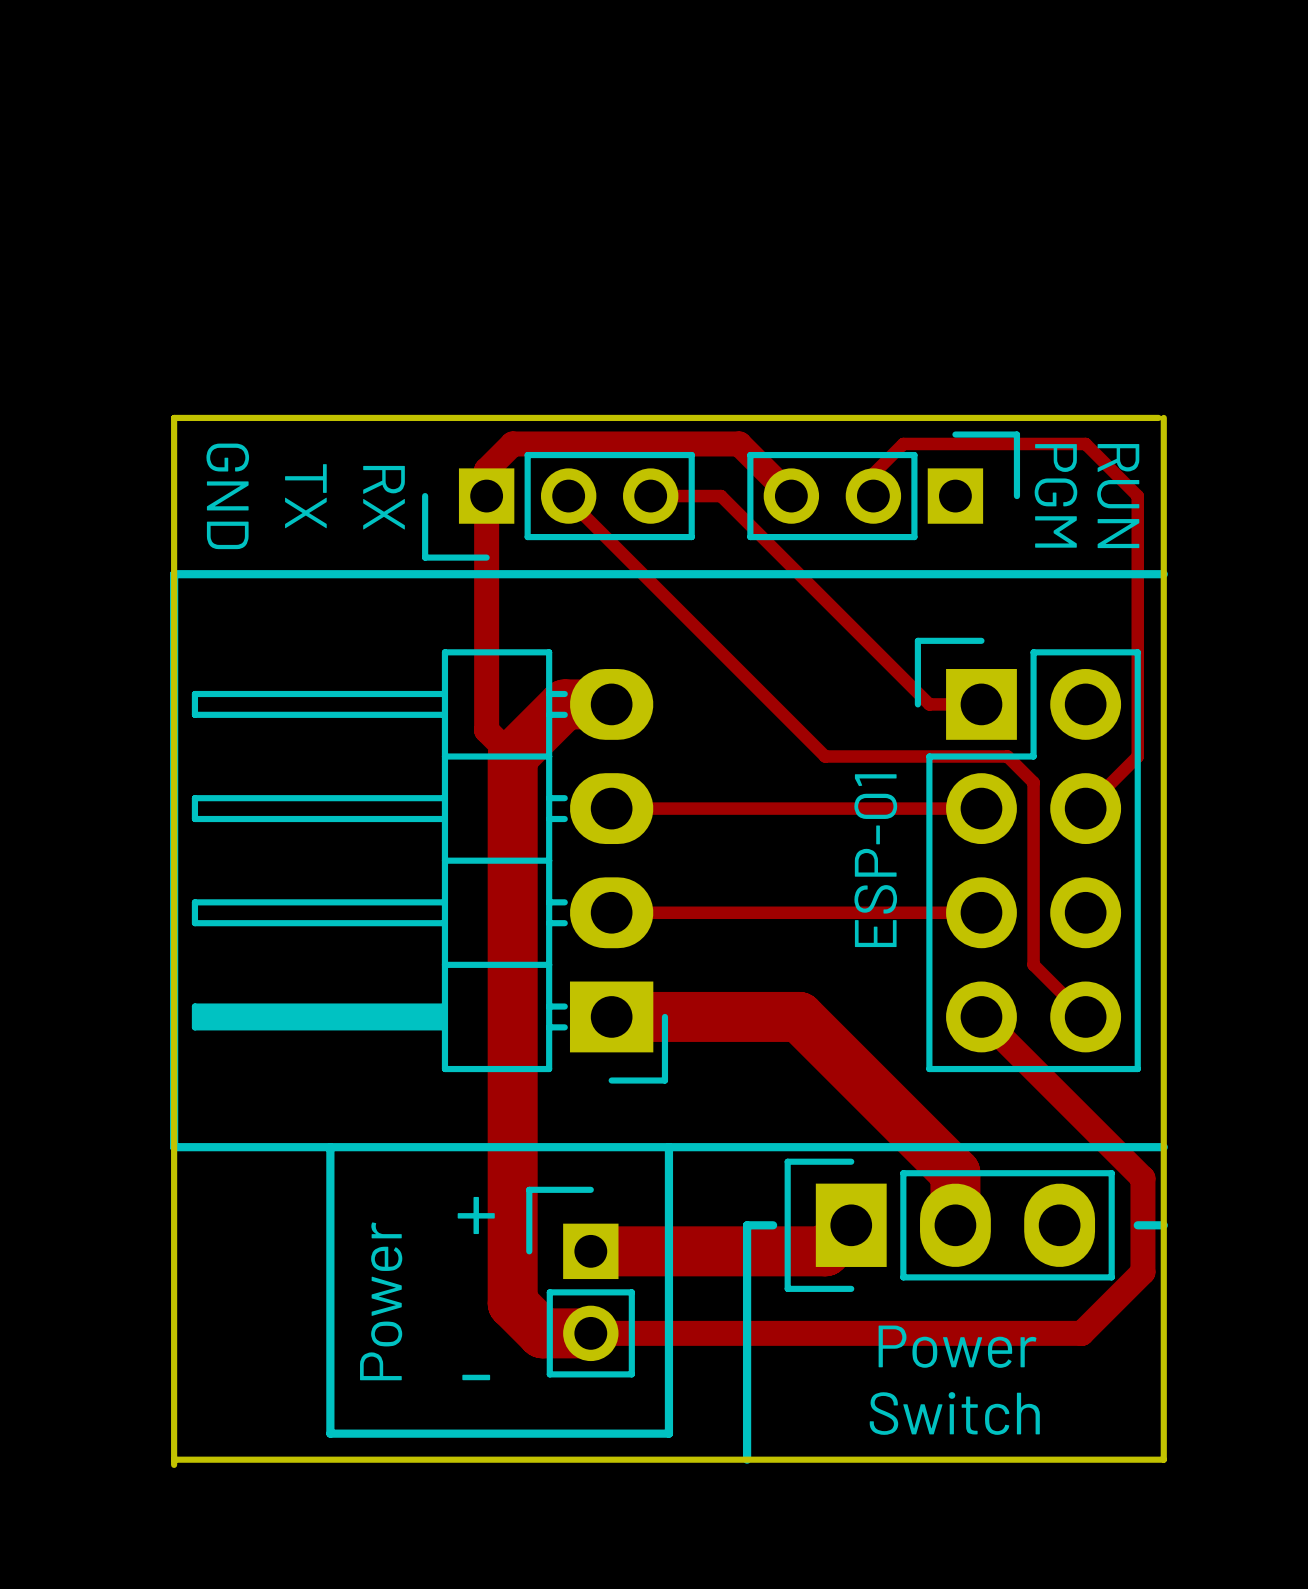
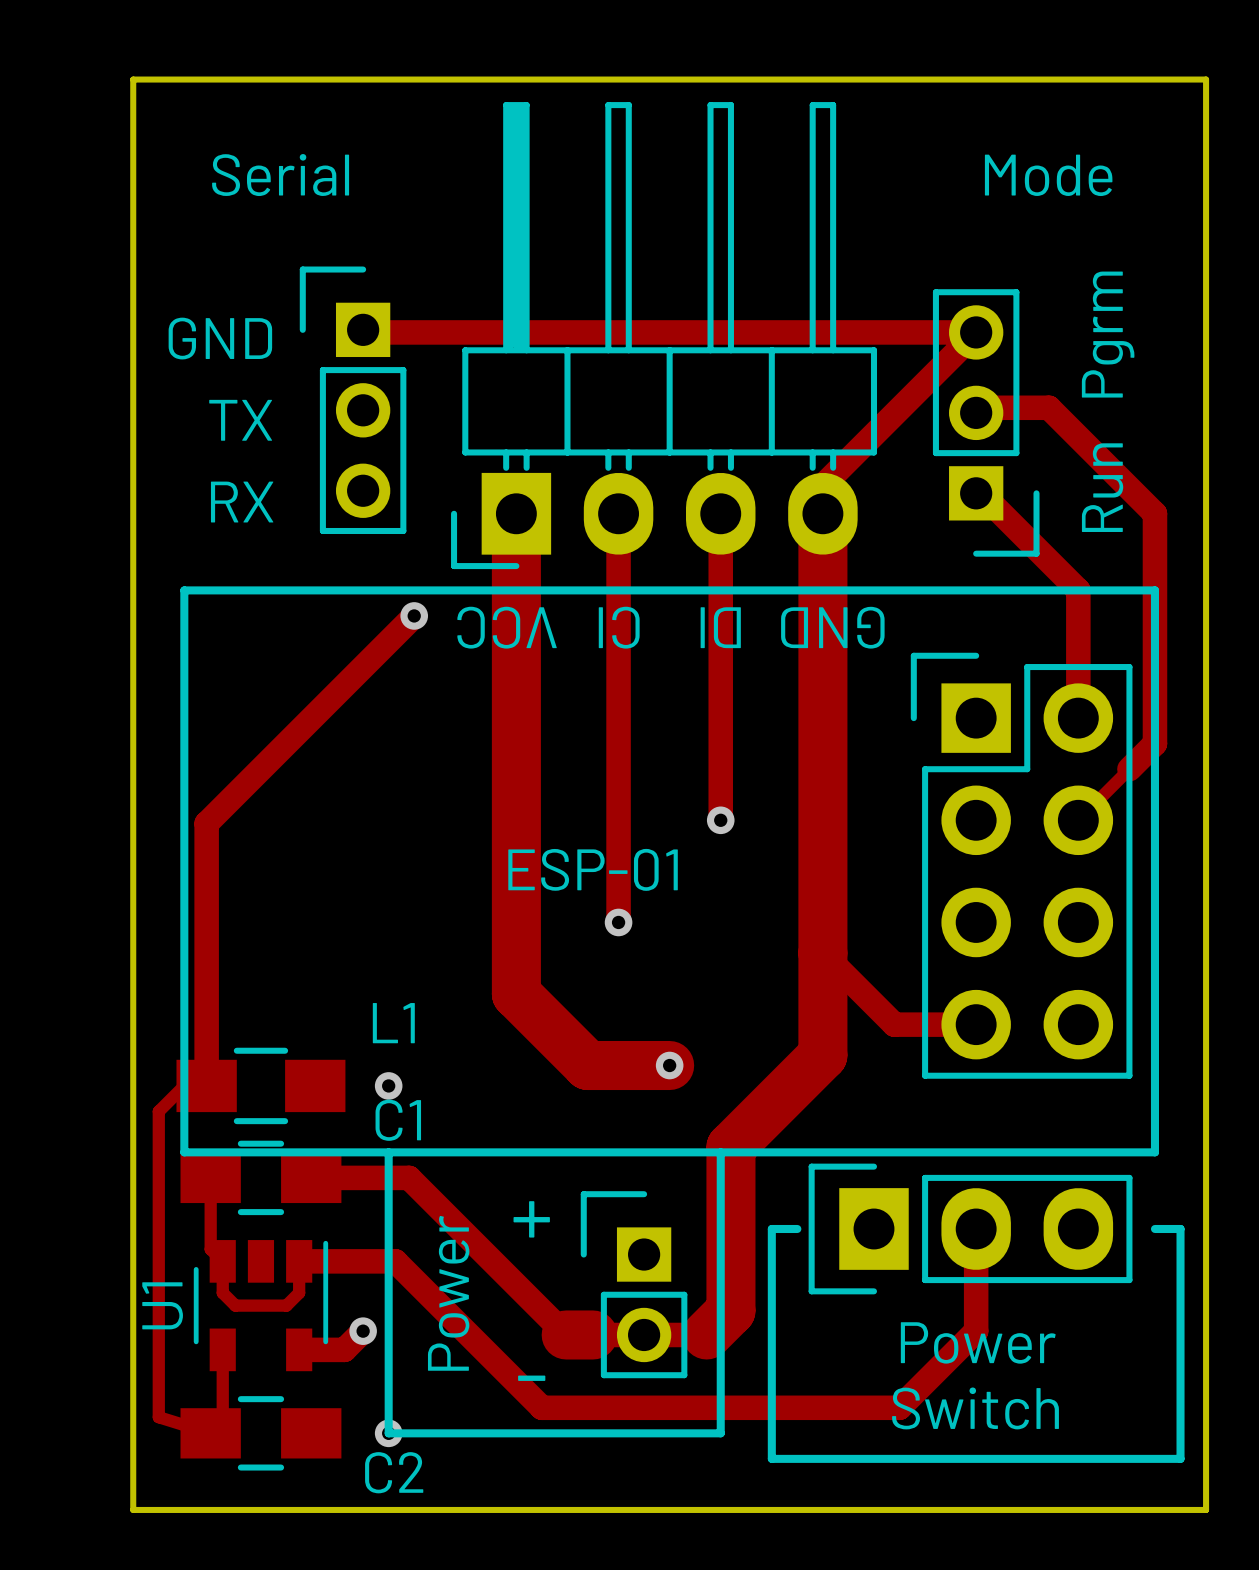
board edge: none -> (133, 79) (1206, 79) (1206, 1509) (133, 1509) (133, 79)
text: none -> Serial (280, 175)
text: none -> Mode (1048, 175)
track: none -> (363, 329) (365, 332) (976, 332) (822, 485) (822, 1055) (730, 1147) (730, 1310) (706, 1334)
text: none -> Pgrm (1108, 334)
part: none -> (353, 400)
board edge: (1158, 417) (174, 417) (174, 1464) -> none
board edge: (1163, 417) (1163, 1459) (174, 1459) -> none
track: none -> (976, 488) (1078, 590) (1078, 718)
part rotation: 0° (883, 485) -> 90° clockwise (986, 422)
text: PGM (1055, 495) -> none
text rotation: 0° (227, 496) -> 90° counterclockwise (220, 338)
text position: GND (227, 496) -> GND (220, 338)
text rotation: 0° (305, 496) -> 90° counterclockwise (240, 420)
text position: TX (305, 496) -> TX (240, 420)
track: none -> (516, 513) (516, 769)
track: (568, 496) (568, 499) (825, 756) (1007, 756) (1033, 782) (1033, 964) (1085, 1016) -> none
track: none -> (618, 513) (618, 922)
track: (650, 496) (721, 496) (929, 704) (981, 704) -> none
track: none -> (720, 513) (720, 820)
track: (791, 496) (739, 443) (512, 443) (486, 470) (486, 730) (512, 756) (564, 704) (611, 704) -> none
track: (873, 496) (873, 473) (903, 443) (1085, 443) (1137, 496) (1137, 756) -> (976, 407) (1048, 407) (1154, 513) (1154, 743) (1129, 769)
text: RUN (1118, 496) -> Run (1102, 487)
text rotation: 0° (384, 497) -> 90° counterclockwise (242, 502)
text position: RX (384, 497) -> RX (242, 502)
part: (558, 506) -> none
line: none -> (1154, 590) (1154, 1152)
track: none -> (414, 615) (206, 823) (206, 1085) (184, 1085) (158, 1111) (158, 1417) (210, 1433) (222, 1421) (222, 1349)
via: none -> (414, 615)
text: none -> VCC (507, 627)
text: none -> CI (619, 627)
text: none -> DI (720, 627)
text: none -> GND (832, 627)
track: (611, 808) (981, 808) -> none
via: none -> (720, 820)
text rotation: 0° (875, 860) -> 90° clockwise (593, 869)
text position: ESP-01 (875, 860) -> ESP-01 (593, 869)
part rotation: 0° (429, 866) -> 90° clockwise (664, 335)
part position: (429, 866) -> (664, 335)
track: (611, 912) (981, 912) -> none
via: none -> (618, 922)
track: (512, 985) (512, 1303) (542, 1333) (563, 1333) -> (311, 1177) (409, 1177) (566, 1334)
track: none -> (516, 993) (587, 1065) (669, 1065)
track: (611, 1016) (799, 1016) (955, 1173) (955, 1225) -> none
track: (981, 1016) (1142, 1178) (1142, 1272) (1081, 1333) (706, 1333) -> (976, 1024) (894, 1024) (822, 953)
via: none -> (669, 1065)
L1: none -> (260, 1085)
via: none -> (388, 1085)
line: (330, 1147) (330, 1433) (382, 1433) -> (388, 1152) (388, 1433)
line: (668, 1147) (668, 1433) -> (720, 1152) (720, 1433) (669, 1433)
track: none -> (210, 1177) (210, 1249) (222, 1261) (222, 1292) (235, 1305) (286, 1305) (299, 1292) (299, 1261) (395, 1261) (541, 1407) (899, 1407) (976, 1331) (976, 1228)
C1: none -> (260, 1177)
text position: + (476, 1215) -> + (531, 1219)
line: (773, 1225) (747, 1225) (747, 1459) -> none
track: (851, 1225) (825, 1251) (590, 1251) -> none
part position: (949, 1225) -> (970, 1228)
line: (1137, 1225) (1163, 1225) -> (797, 1228) (771, 1228) (771, 1458) (1180, 1458) (1180, 1228) (1154, 1228)
part position: (580, 1282) -> (634, 1284)
text position: Power (381, 1301) -> Power (448, 1293)
U1: none -> (260, 1305)
track: none -> (363, 1331) (344, 1349) (299, 1349)
via: none -> (363, 1331)
text position: Power (957, 1346) -> Power (978, 1342)
text position: - (476, 1377) -> - (531, 1378)
text position: Switch (954, 1413) -> Switch (975, 1408)
C2: none -> (260, 1433)
via: none -> (388, 1433)

